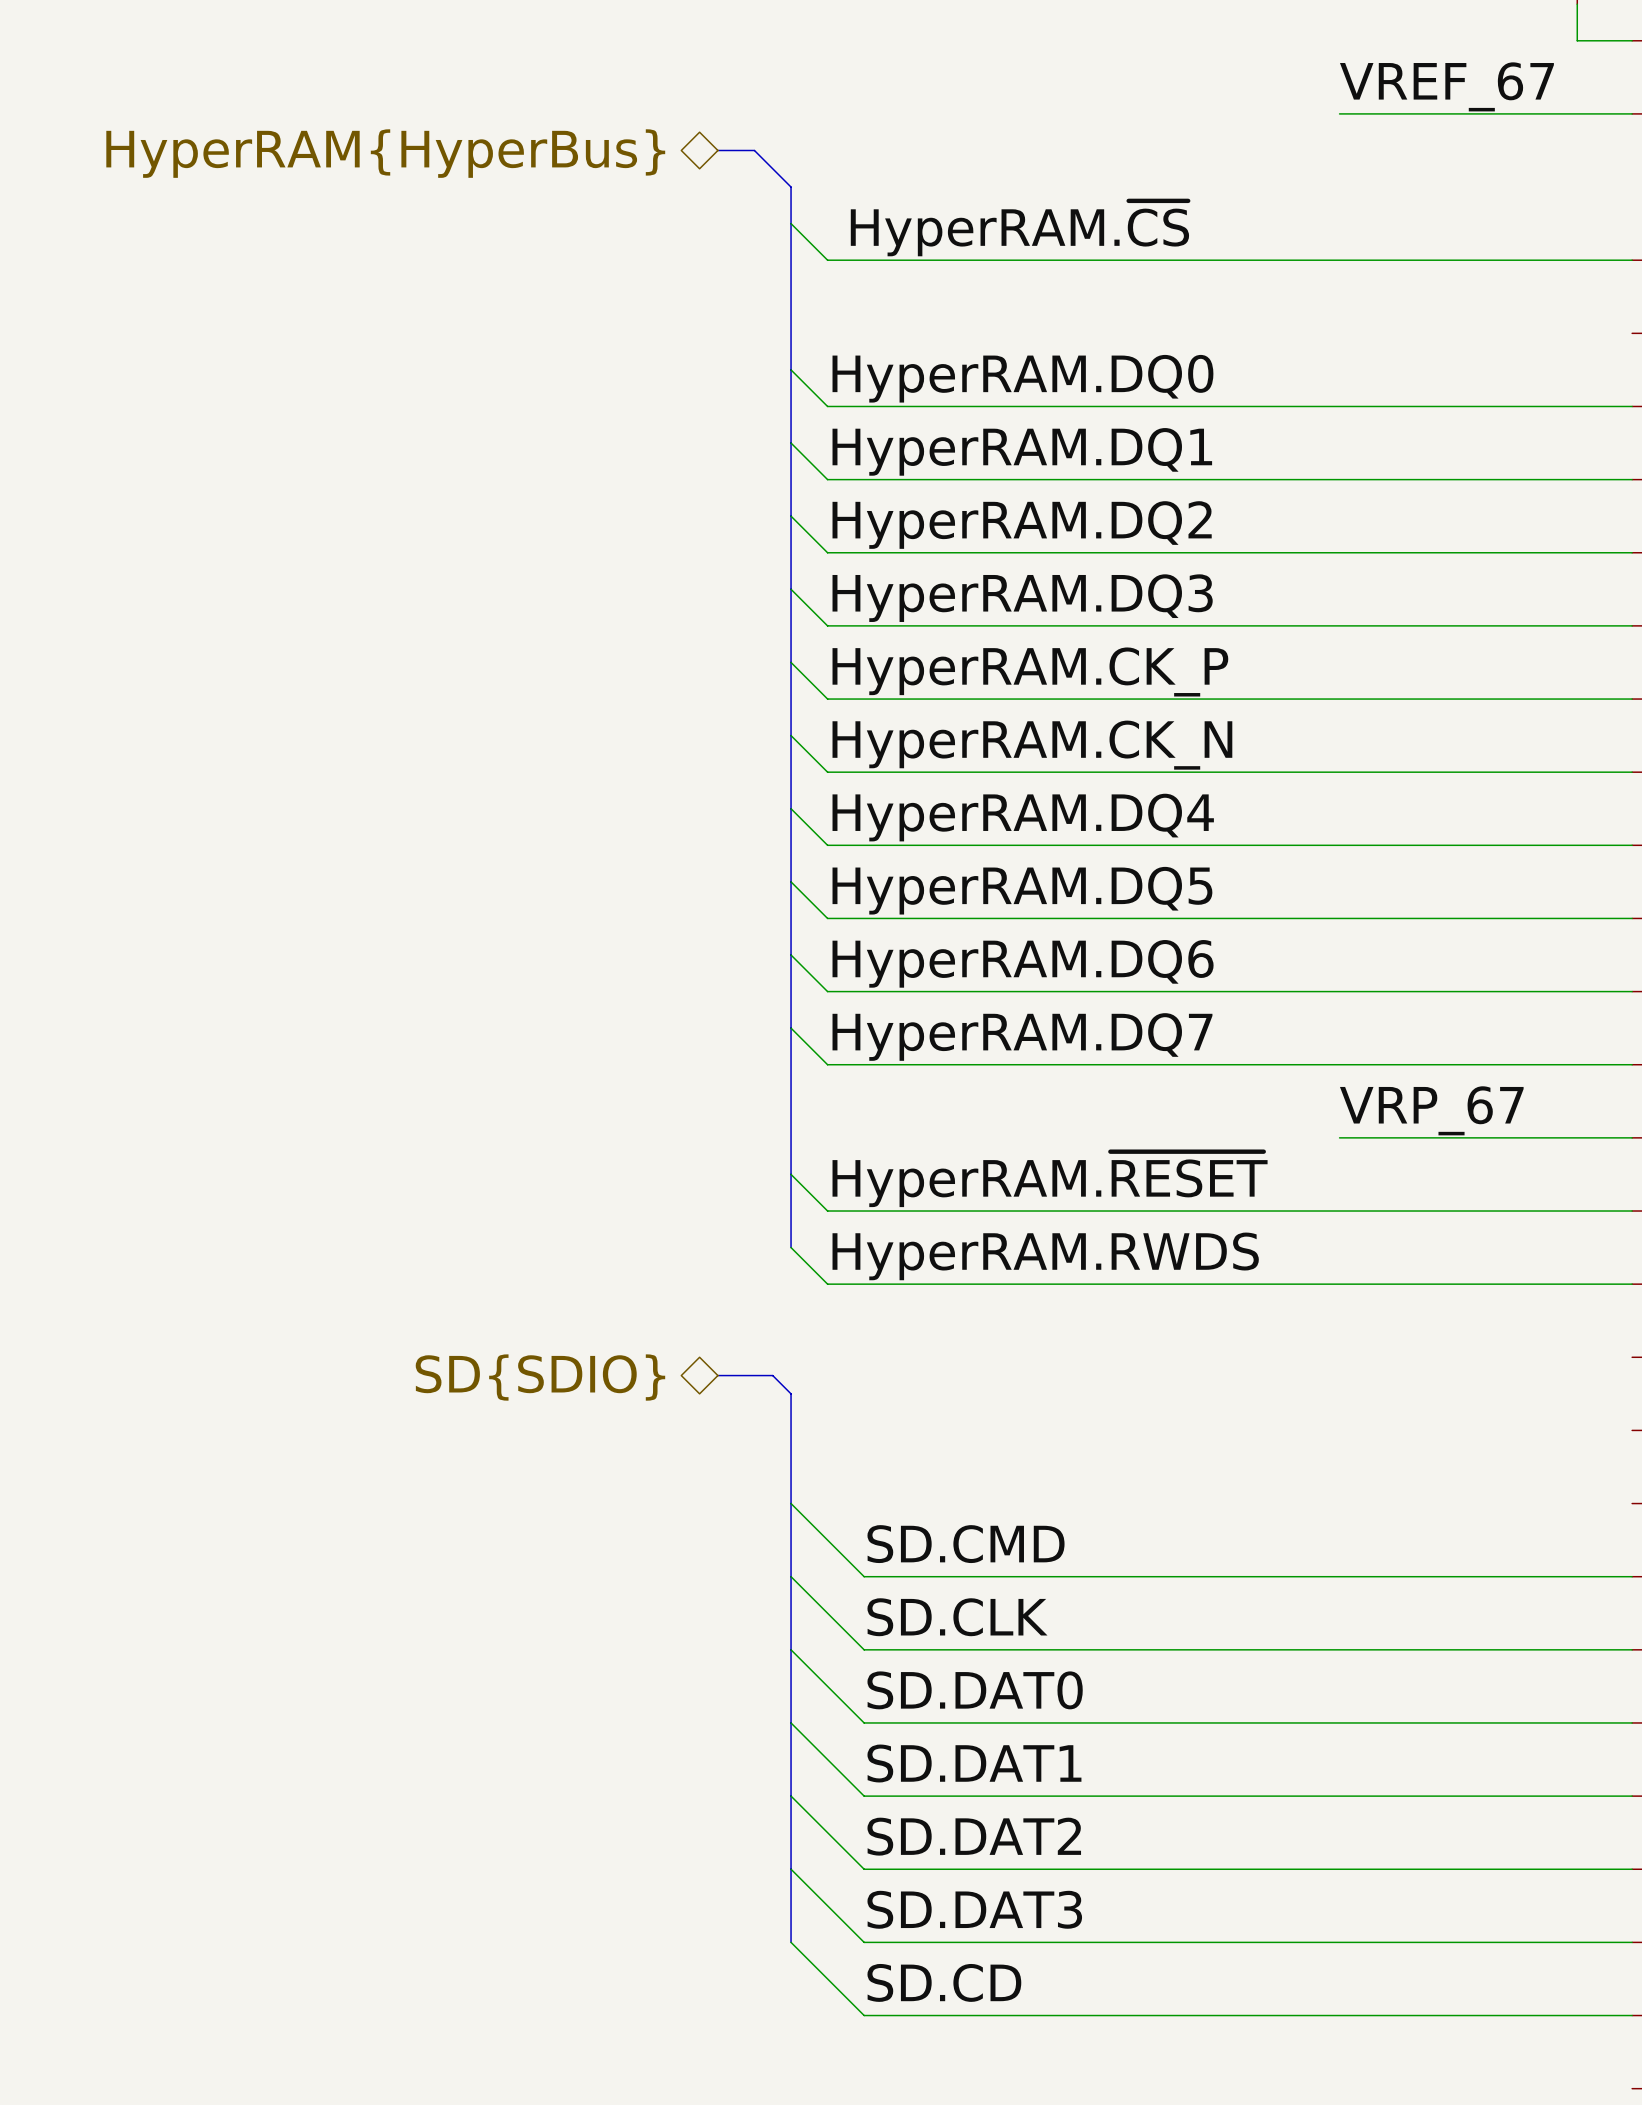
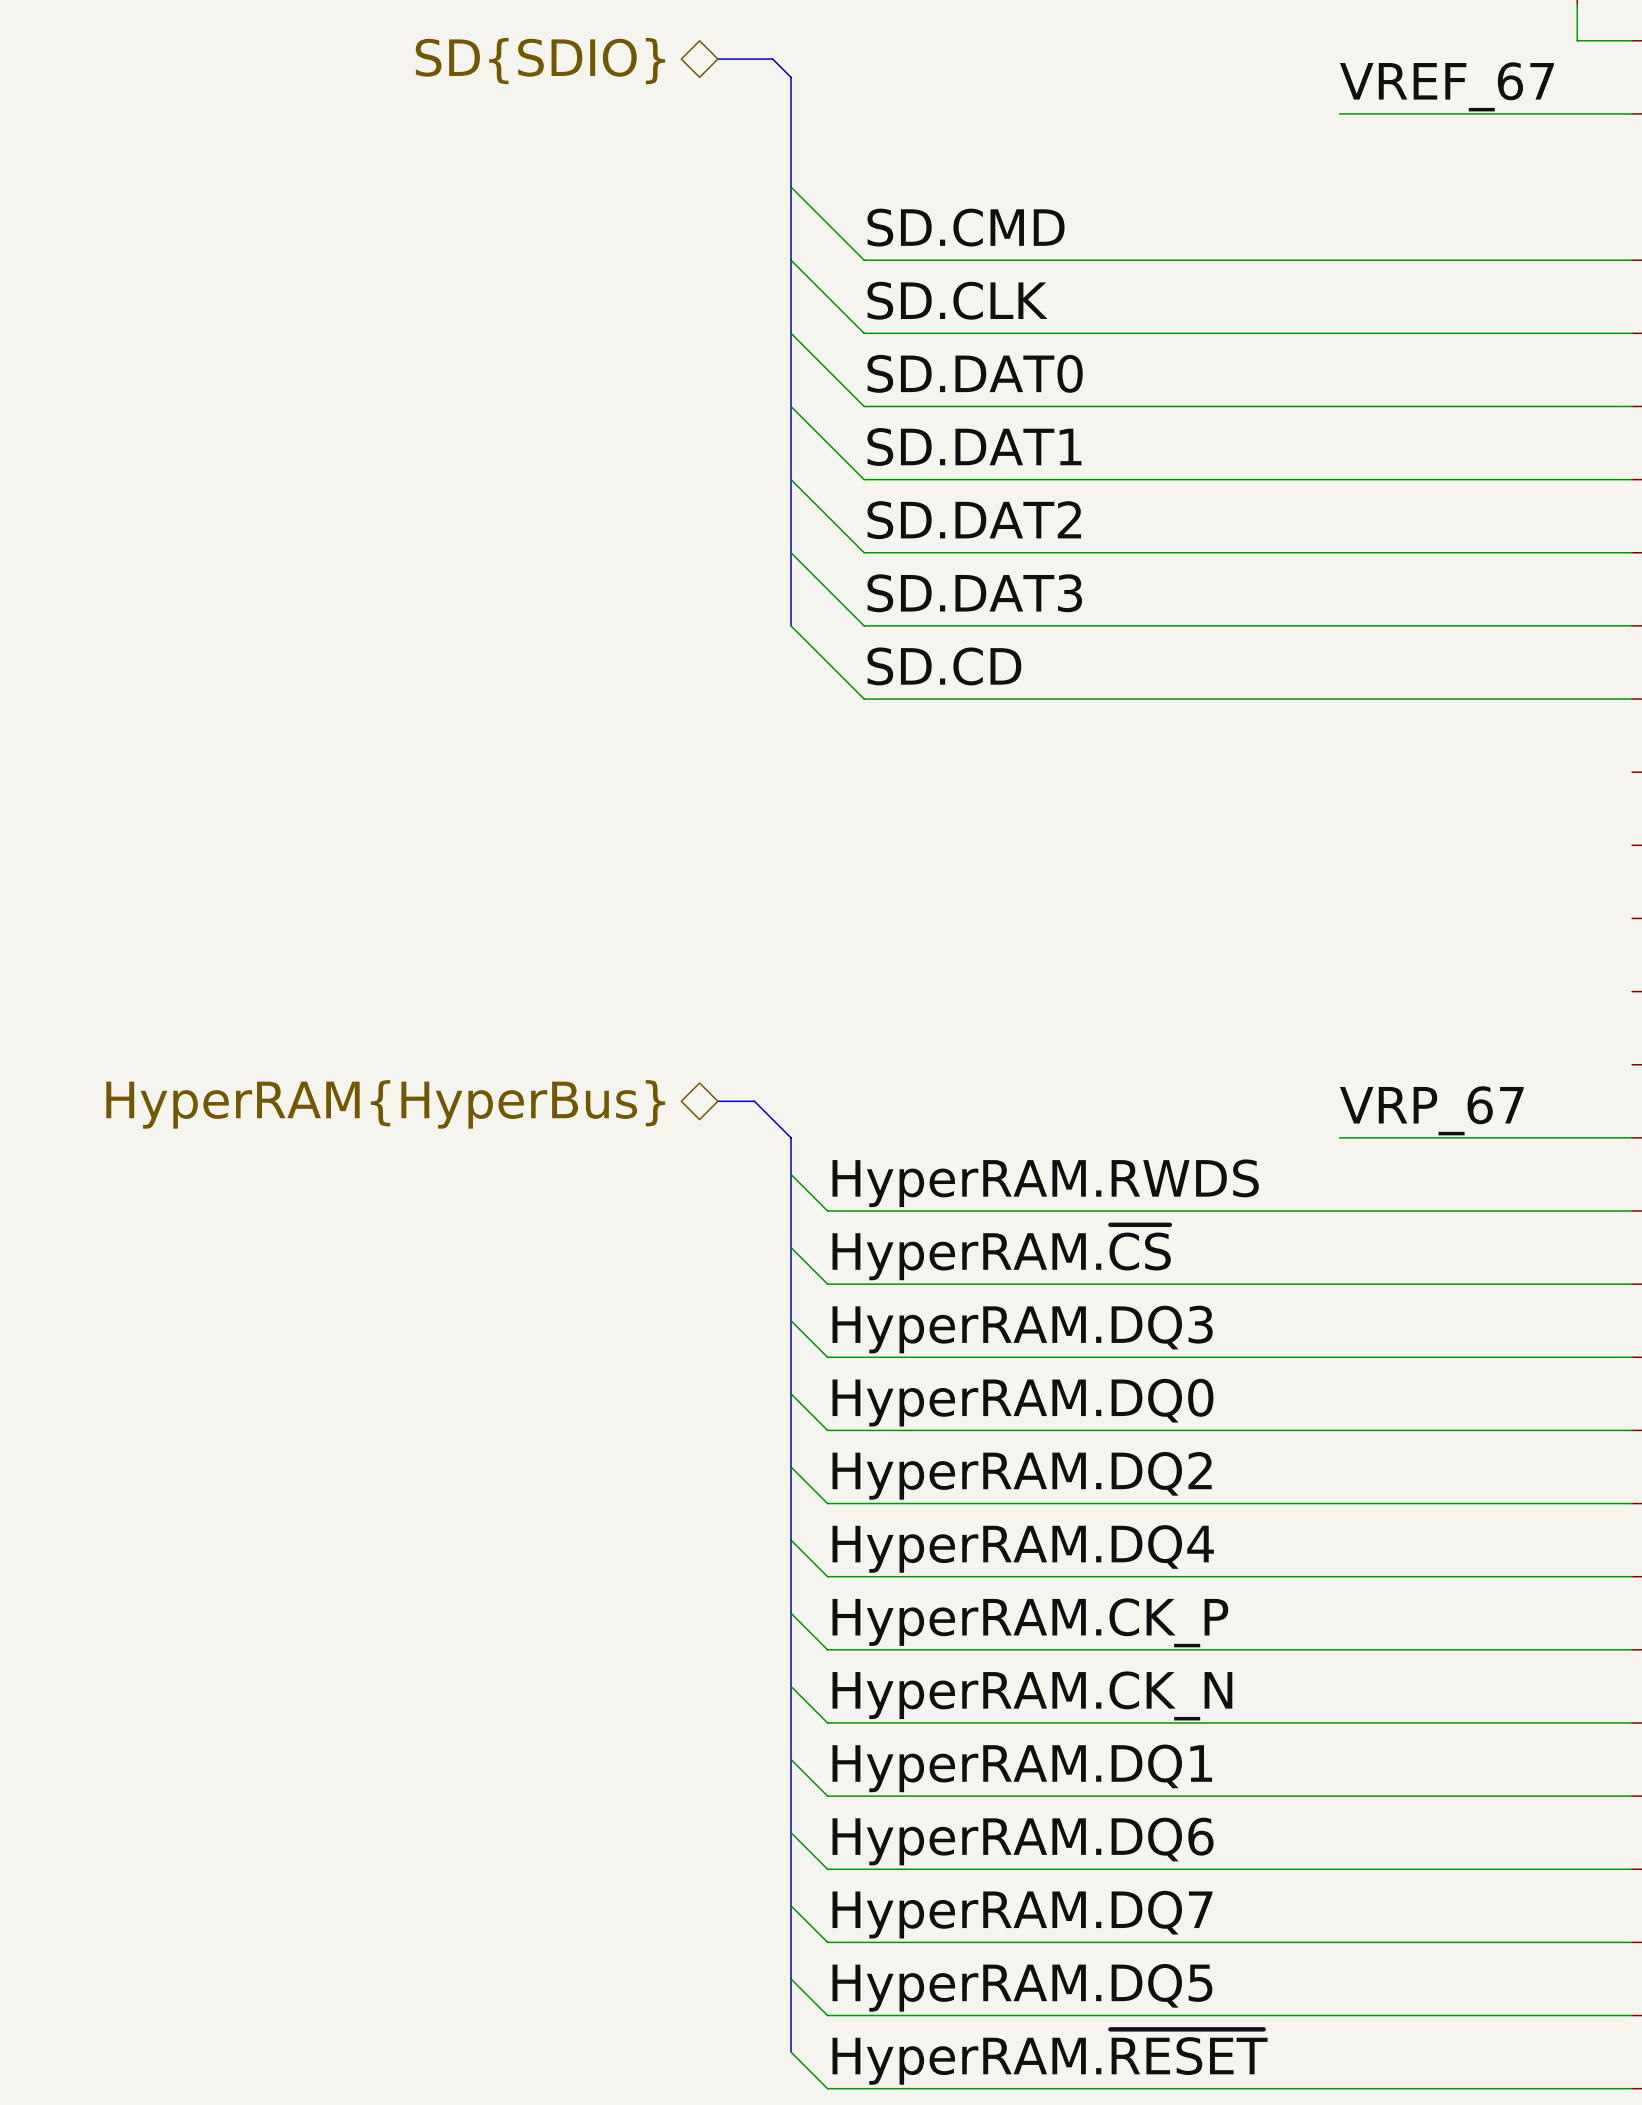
hierarchical label: none -> SD{SDIO} (540, 61)
bus: (717, 150) (754, 150) (791, 187) -> (717, 59) (772, 59) (791, 77) (791, 187)
hierarchical label: HyperRAM{HyperBus} (385, 153) -> none
wire: (791, 223) (827, 260) (864, 260) -> (791, 187) (864, 260)
label: HyperRAM.~{CS} (1019, 228) -> SD.CMD (966, 227)
wire: none -> (791, 260) (864, 333) (1632, 333)
label: none -> SD.CLK (957, 300)
wire: (791, 369) (827, 406) (864, 406) -> (791, 333) (864, 406)
label: none -> SD.DAT0 (975, 373)
label: HyperRAM.DQ0 (1022, 378) -> none
wire: (791, 443) (827, 479) (864, 479) -> (791, 406) (864, 479)
label: none -> SD.DAT1 (974, 447)
label: HyperRAM.DQ1 (1022, 451) -> none
wire: (791, 516) (827, 552) (864, 552) -> (791, 479) (864, 552)
label: none -> SD.DAT2 (974, 520)
label: HyperRAM.DQ2 (1022, 525) -> none
wire: (791, 589) (827, 625) (864, 625) -> (791, 552) (864, 625)
label: none -> SD.DAT3 (974, 593)
label: HyperRAM.DQ3 (1022, 598) -> none
bus: (791, 625) (791, 1137) -> (717, 1101) (754, 1101) (791, 1137)
wire: (791, 662) (827, 699) (864, 699) -> (791, 625) (864, 699)
label: none -> SD.CD (944, 666)
label: HyperRAM.CK_P (1030, 671) -> none
wire: (791, 735) (827, 772) (1632, 772) -> none
label: HyperRAM.CK_N (1032, 745) -> none
wire: (791, 808) (827, 845) (1632, 845) -> none
label: HyperRAM.DQ4 (1023, 817) -> none
wire: (791, 881) (827, 918) (1632, 918) -> (791, 1320) (827, 1357) (1632, 1357)
label: HyperRAM.DQ5 (1022, 890) -> none
wire: (791, 955) (827, 991) (1632, 991) -> (791, 1393) (827, 1430) (1632, 1430)
label: HyperRAM.DQ6 (1023, 963) -> none
wire: (791, 1028) (827, 1064) (1632, 1064) -> (791, 1466) (827, 1503) (1632, 1503)
label: HyperRAM.DQ7 (1022, 1036) -> none
hierarchical label: none -> HyperRAM{HyperBus} (385, 1104)
label: HyperRAM.~{RESET} (1050, 1179) -> HyperRAM.RWDS (1045, 1183)
label: HyperRAM.RWDS (1045, 1256) -> HyperRAM.~{CS} (1001, 1252)
label: none -> HyperRAM.DQ3 (1022, 1329)
bus: (717, 1375) (772, 1375) (791, 1393) -> (791, 1247) (791, 1393)
hierarchical label: SD{SDIO} (540, 1377) -> none
label: none -> HyperRAM.DQ0 (1022, 1402)
label: none -> HyperRAM.DQ2 (1022, 1475)
wire: (791, 1503) (864, 1576) -> (791, 1540) (827, 1576) (864, 1576)
label: SD.CMD (966, 1544) -> none
label: none -> HyperRAM.DQ4 (1023, 1548)
wire: (791, 1576) (864, 1649) -> (791, 1613) (827, 1649) (864, 1649)
label: SD.CLK (957, 1617) -> none
label: none -> HyperRAM.CK_P (1030, 1622)
wire: (791, 1649) (864, 1722) -> (791, 1686) (827, 1722) (864, 1722)
label: SD.DAT0 (975, 1690) -> none
label: none -> HyperRAM.CK_N (1032, 1695)
wire: (791, 1722) (864, 1796) -> (791, 1759) (827, 1796) (864, 1796)
label: SD.DAT1 (974, 1763) -> none
label: none -> HyperRAM.DQ1 (1022, 1768)
wire: (791, 1796) (864, 1869) -> (791, 1832) (827, 1869) (864, 1869)
label: SD.DAT2 (974, 1836) -> none
label: none -> HyperRAM.DQ6 (1023, 1841)
wire: (791, 1869) (864, 1942) -> (791, 1905) (827, 1942) (864, 1942)
label: SD.DAT3 (974, 1909) -> none
label: none -> HyperRAM.DQ7 (1022, 1914)
wire: (791, 1942) (864, 2015) -> (791, 1978) (827, 2015) (864, 2015)
bus: none -> (791, 1942) (791, 2052)
label: SD.CD (944, 1982) -> none
label: none -> HyperRAM.DQ5 (1022, 1987)
wire: none -> (791, 2052) (827, 2088) (1632, 2088)
label: none -> HyperRAM.~{RESET} (1050, 2057)

